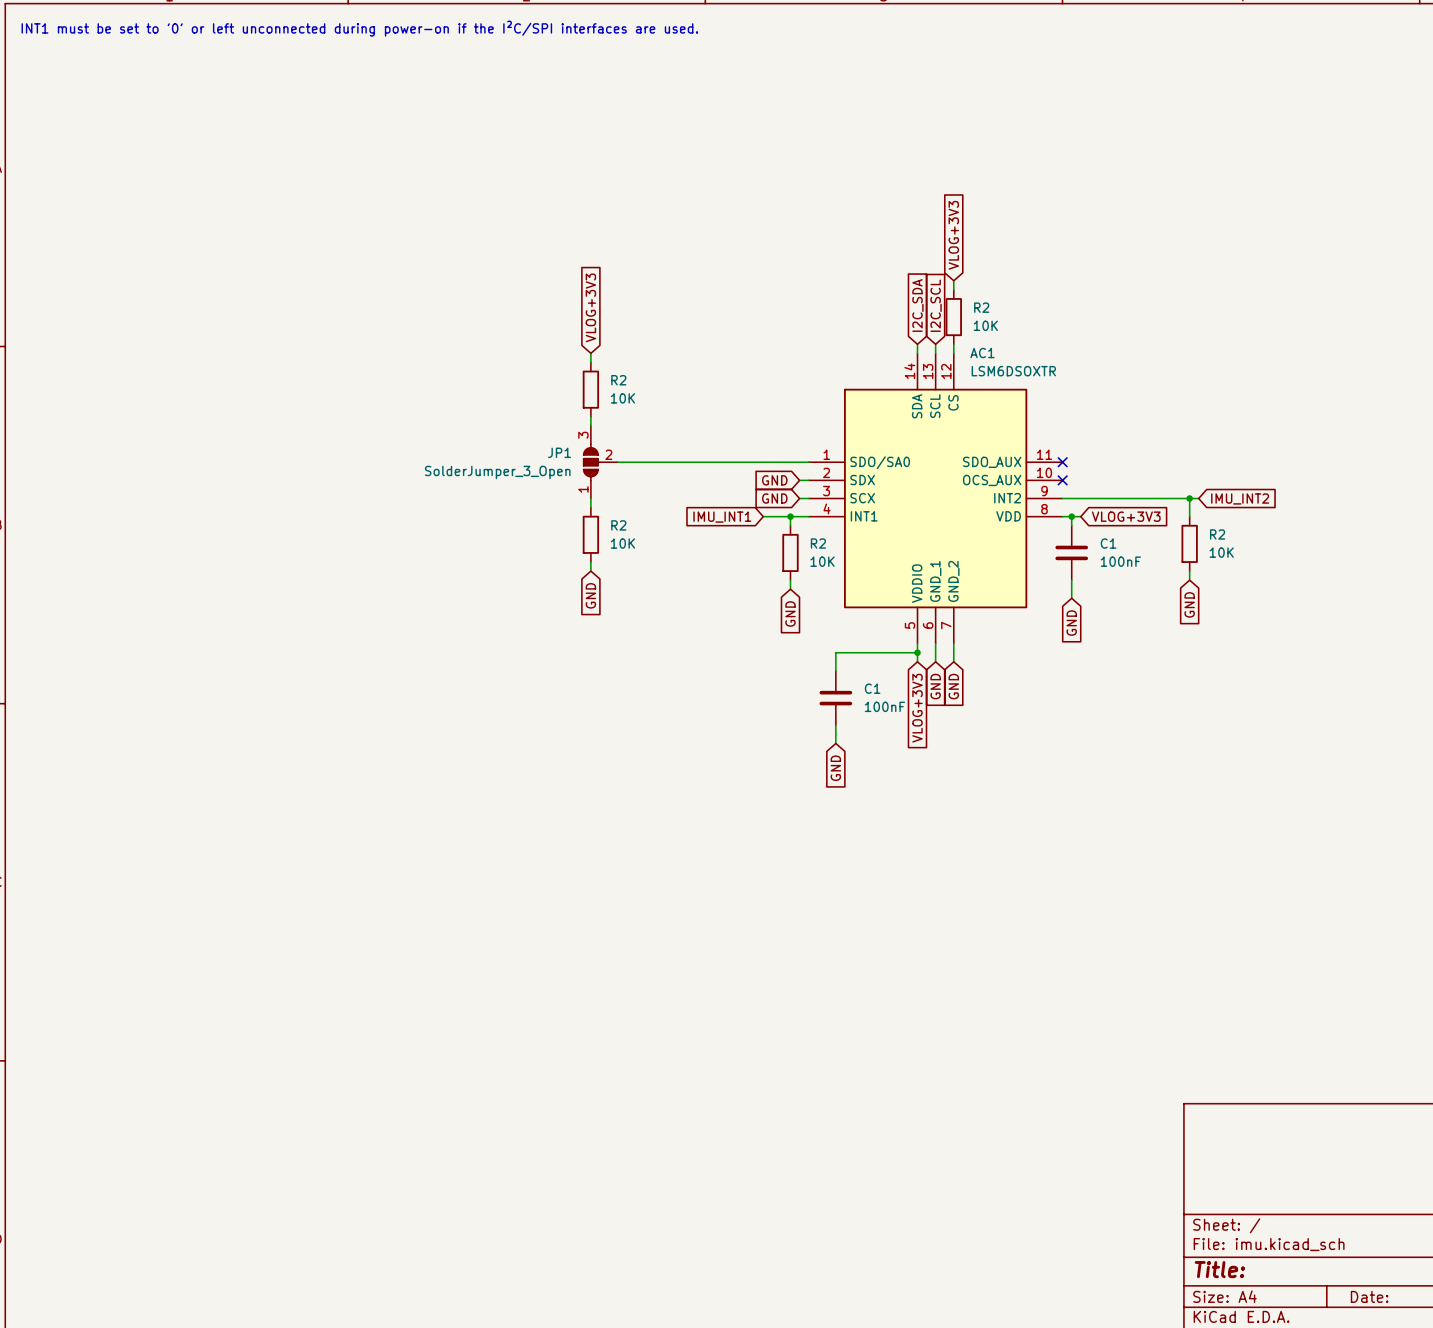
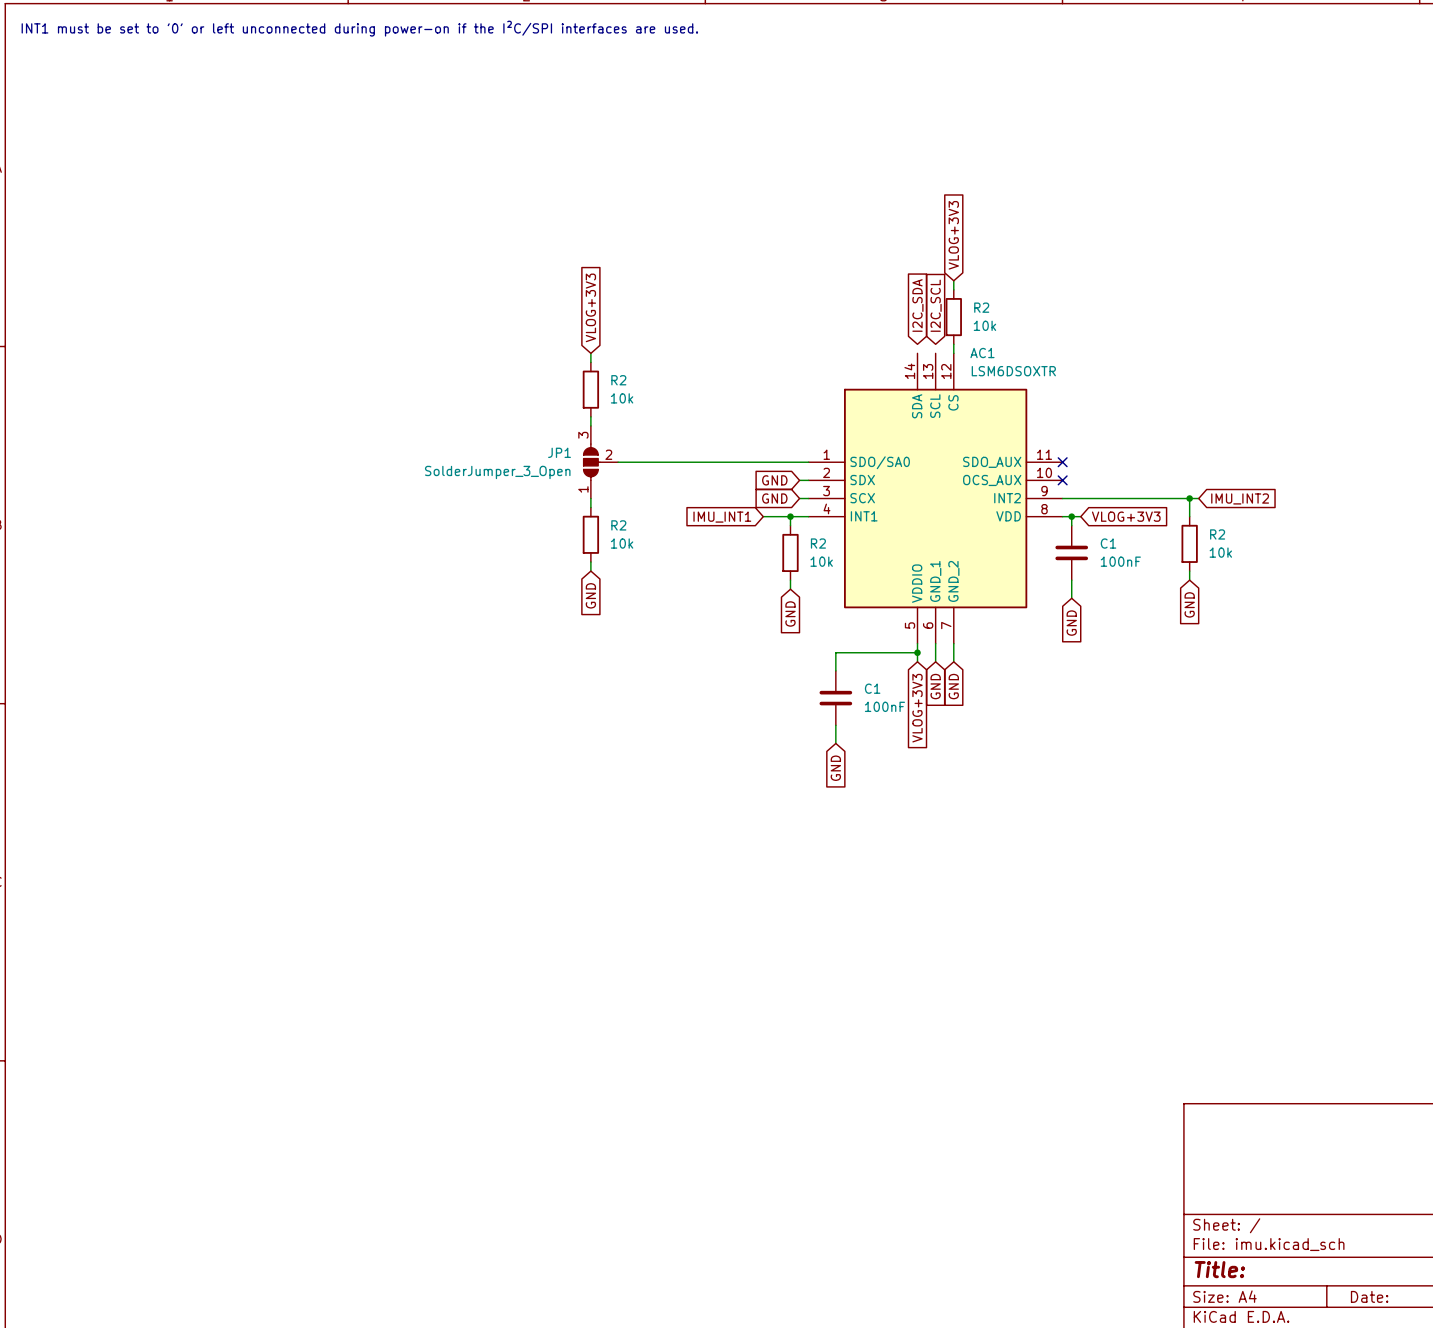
R2 value: 10K (985, 325) -> 10k (984, 325)
wire: (917, 344) (917, 353) -> none
wire: (935, 344) (935, 353) -> none
R2 value: 10K (622, 398) -> 10k (622, 398)
R2 value: 10K (622, 543) -> 10k (622, 543)
R2 value: 10K (1221, 552) -> 10k (1220, 552)
R2 value: 10K (822, 561) -> 10k (821, 561)

